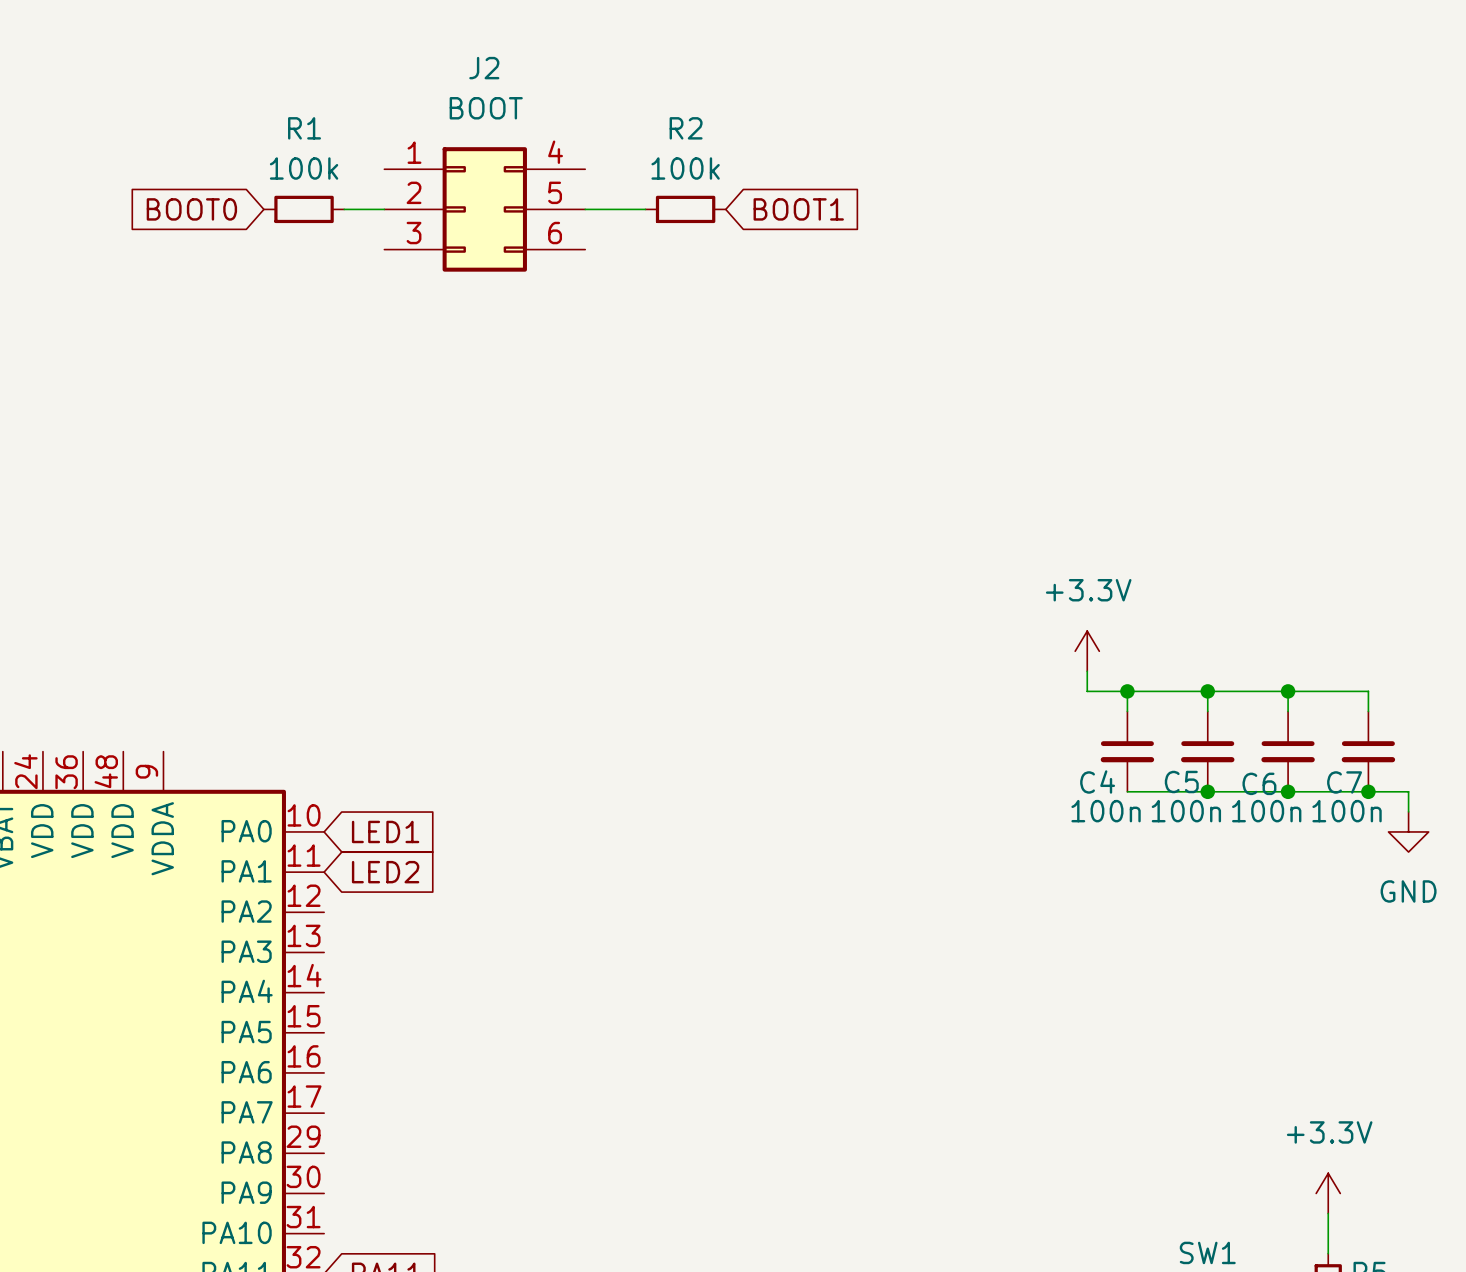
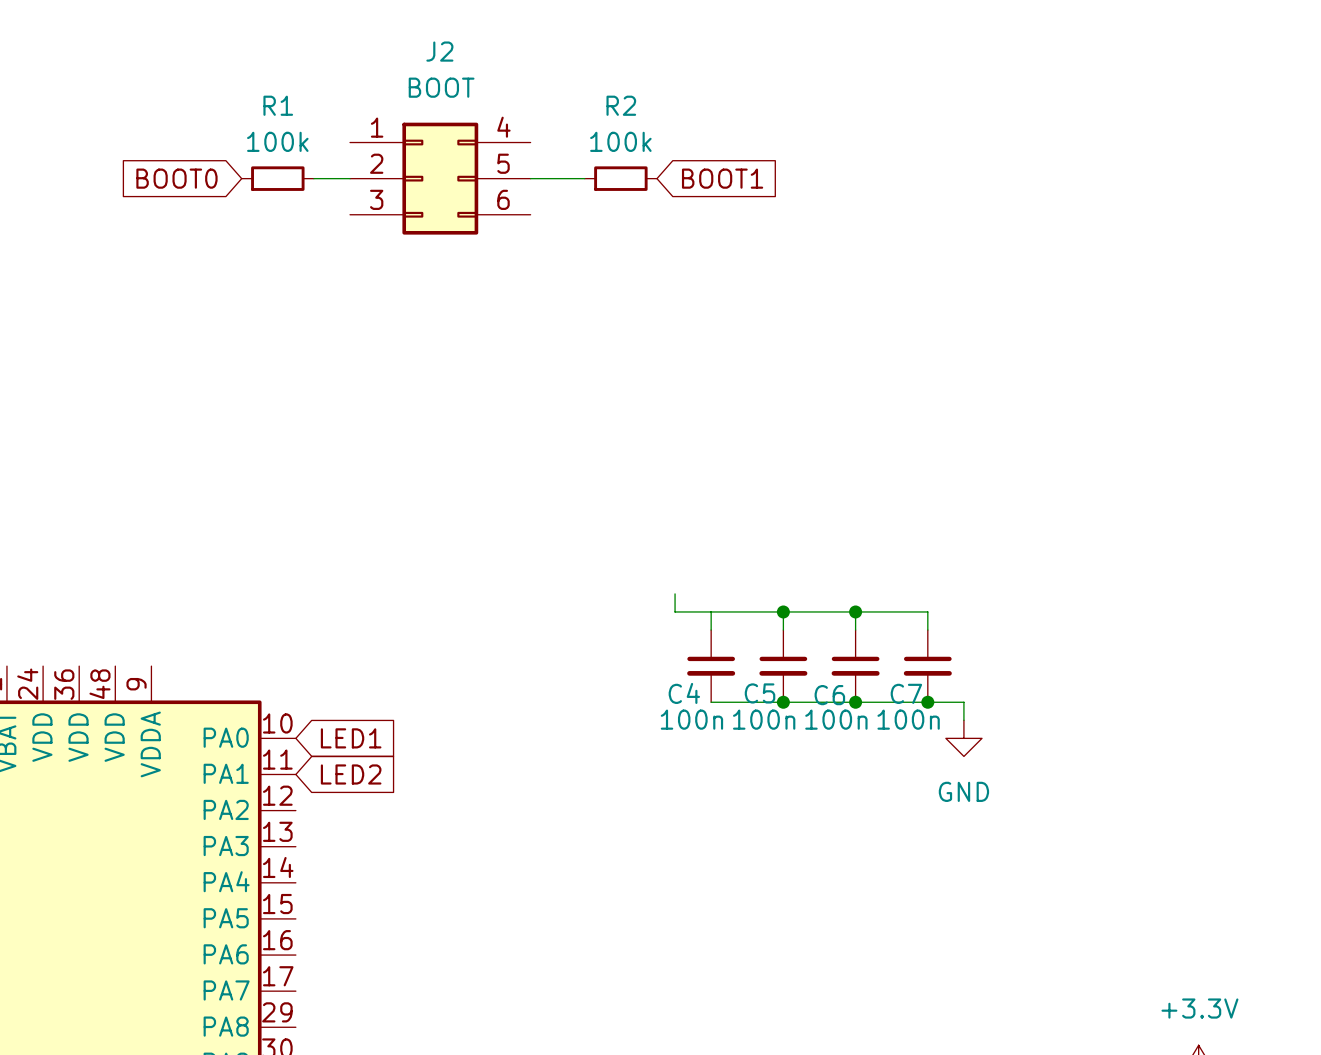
power symbol: +3.3V (1087, 651) -> none
wire: (1087, 671) (1087, 691) (1368, 691) (1368, 711) -> (675, 593) (675, 611) (927, 611) (927, 630)
junction: none -> (783, 611)
junction: none -> (855, 611)
wire: (1127, 691) (1127, 711) -> (711, 611) (711, 630)
junction: (1127, 691) -> none
wire: (1207, 691) (1207, 711) -> (783, 611) (783, 630)
junction: (1207, 691) -> none
wire: (1288, 691) (1288, 711) -> (855, 611) (855, 630)
junction: (1288, 691) -> none
C4 position: (1127, 751) -> (711, 666)
C5 position: (1207, 751) -> (783, 666)
C6 position: (1288, 751) -> (855, 666)
C7 position: (1368, 751) -> (927, 666)
junction: none -> (783, 702)
junction: none -> (855, 702)
junction: none -> (927, 702)
wire: (1127, 791) (1408, 791) (1408, 811) -> (711, 702) (963, 702) (963, 720)
junction: (1207, 791) -> none
junction: (1288, 791) -> none
junction: (1368, 791) -> none
power symbol position: GND (1408, 831) -> GND (963, 738)

